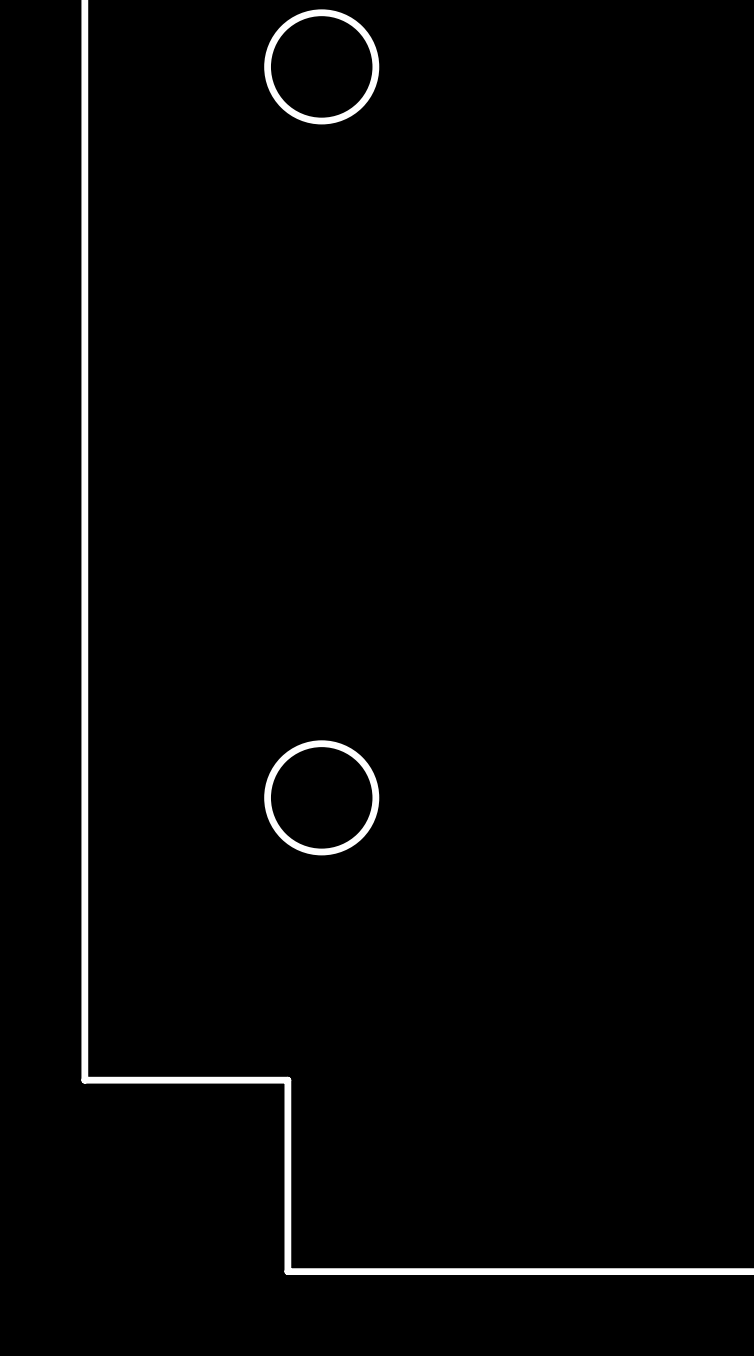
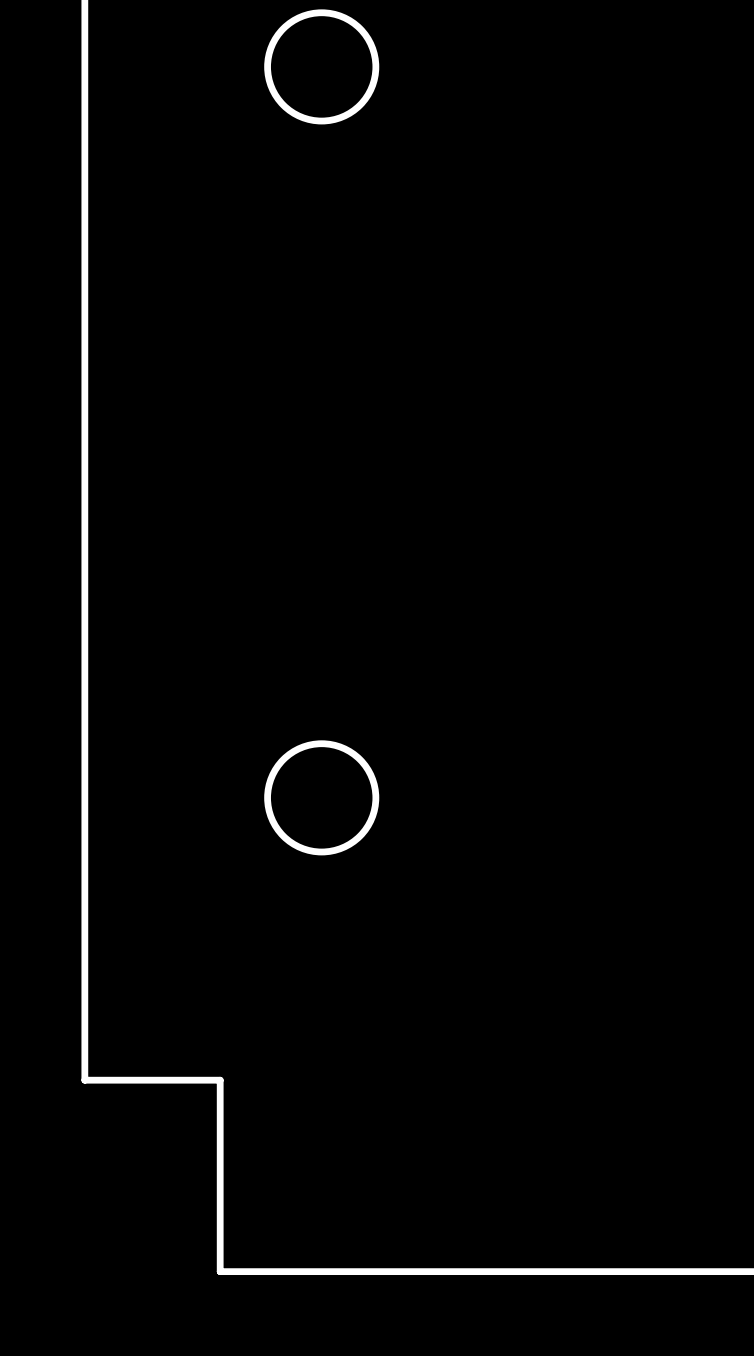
board edge: (220, 1080) (287, 1080) (287, 1271) -> (220, 1080) (220, 1271) (287, 1271)

